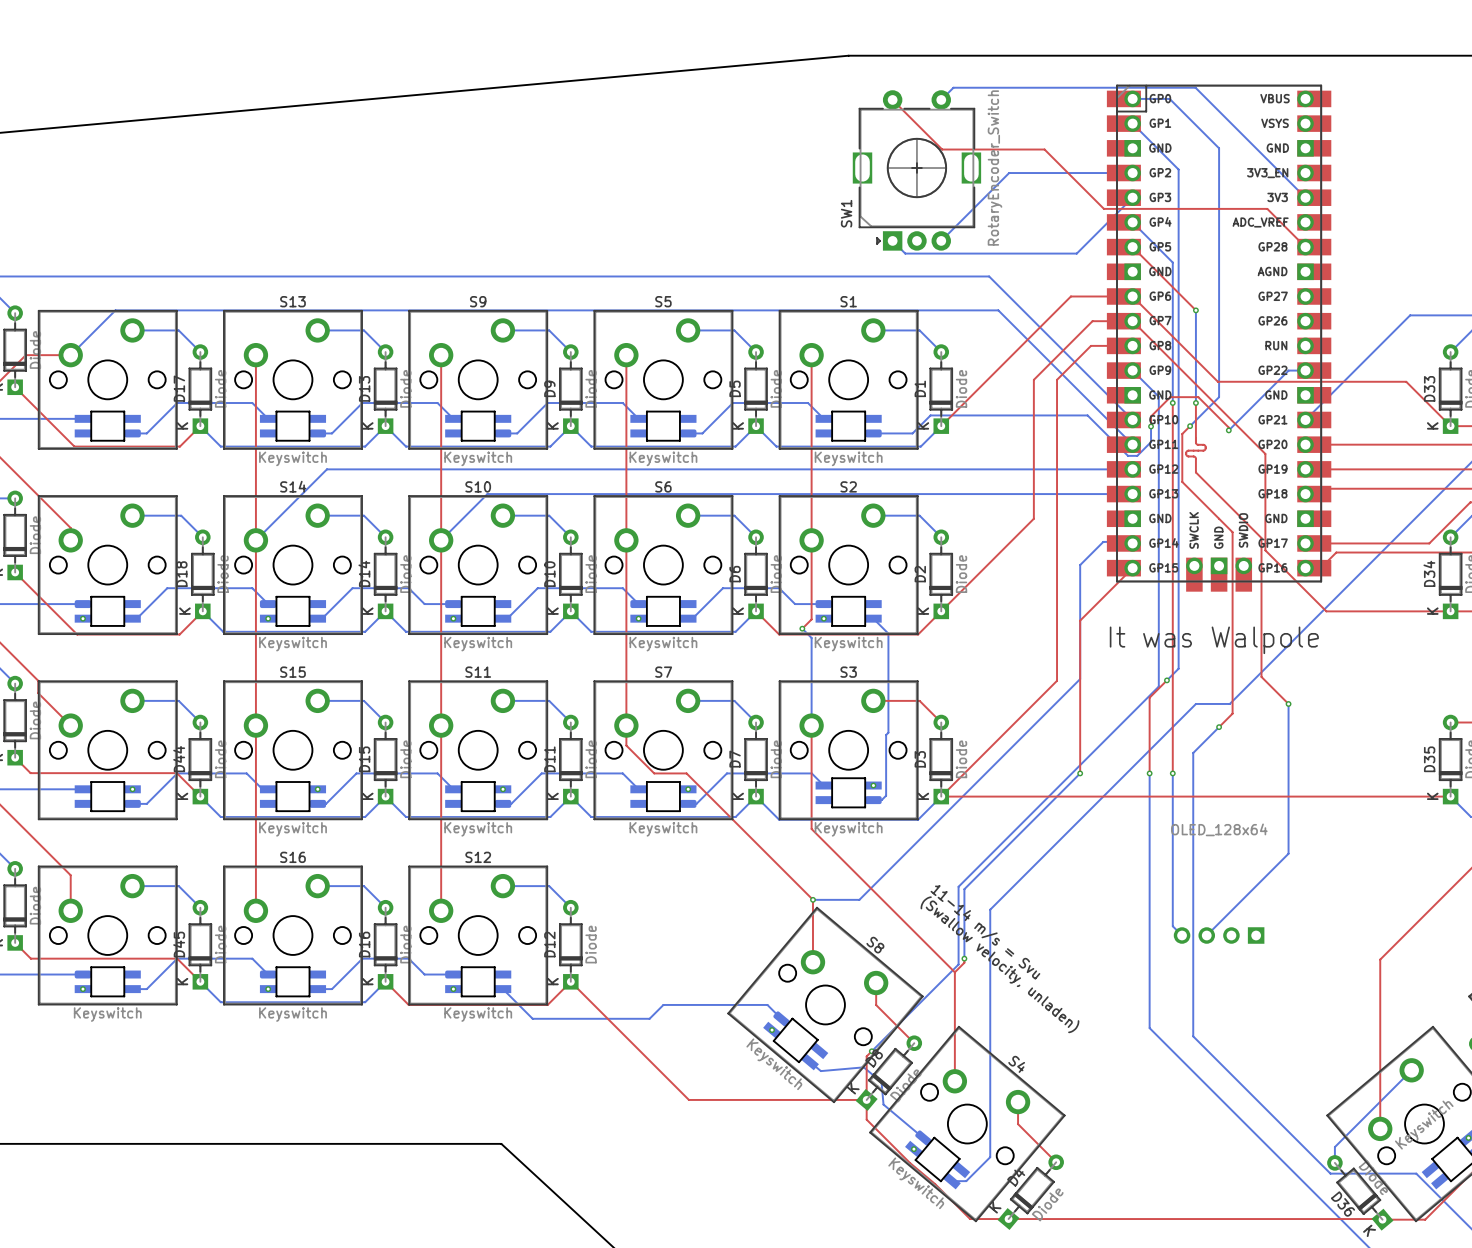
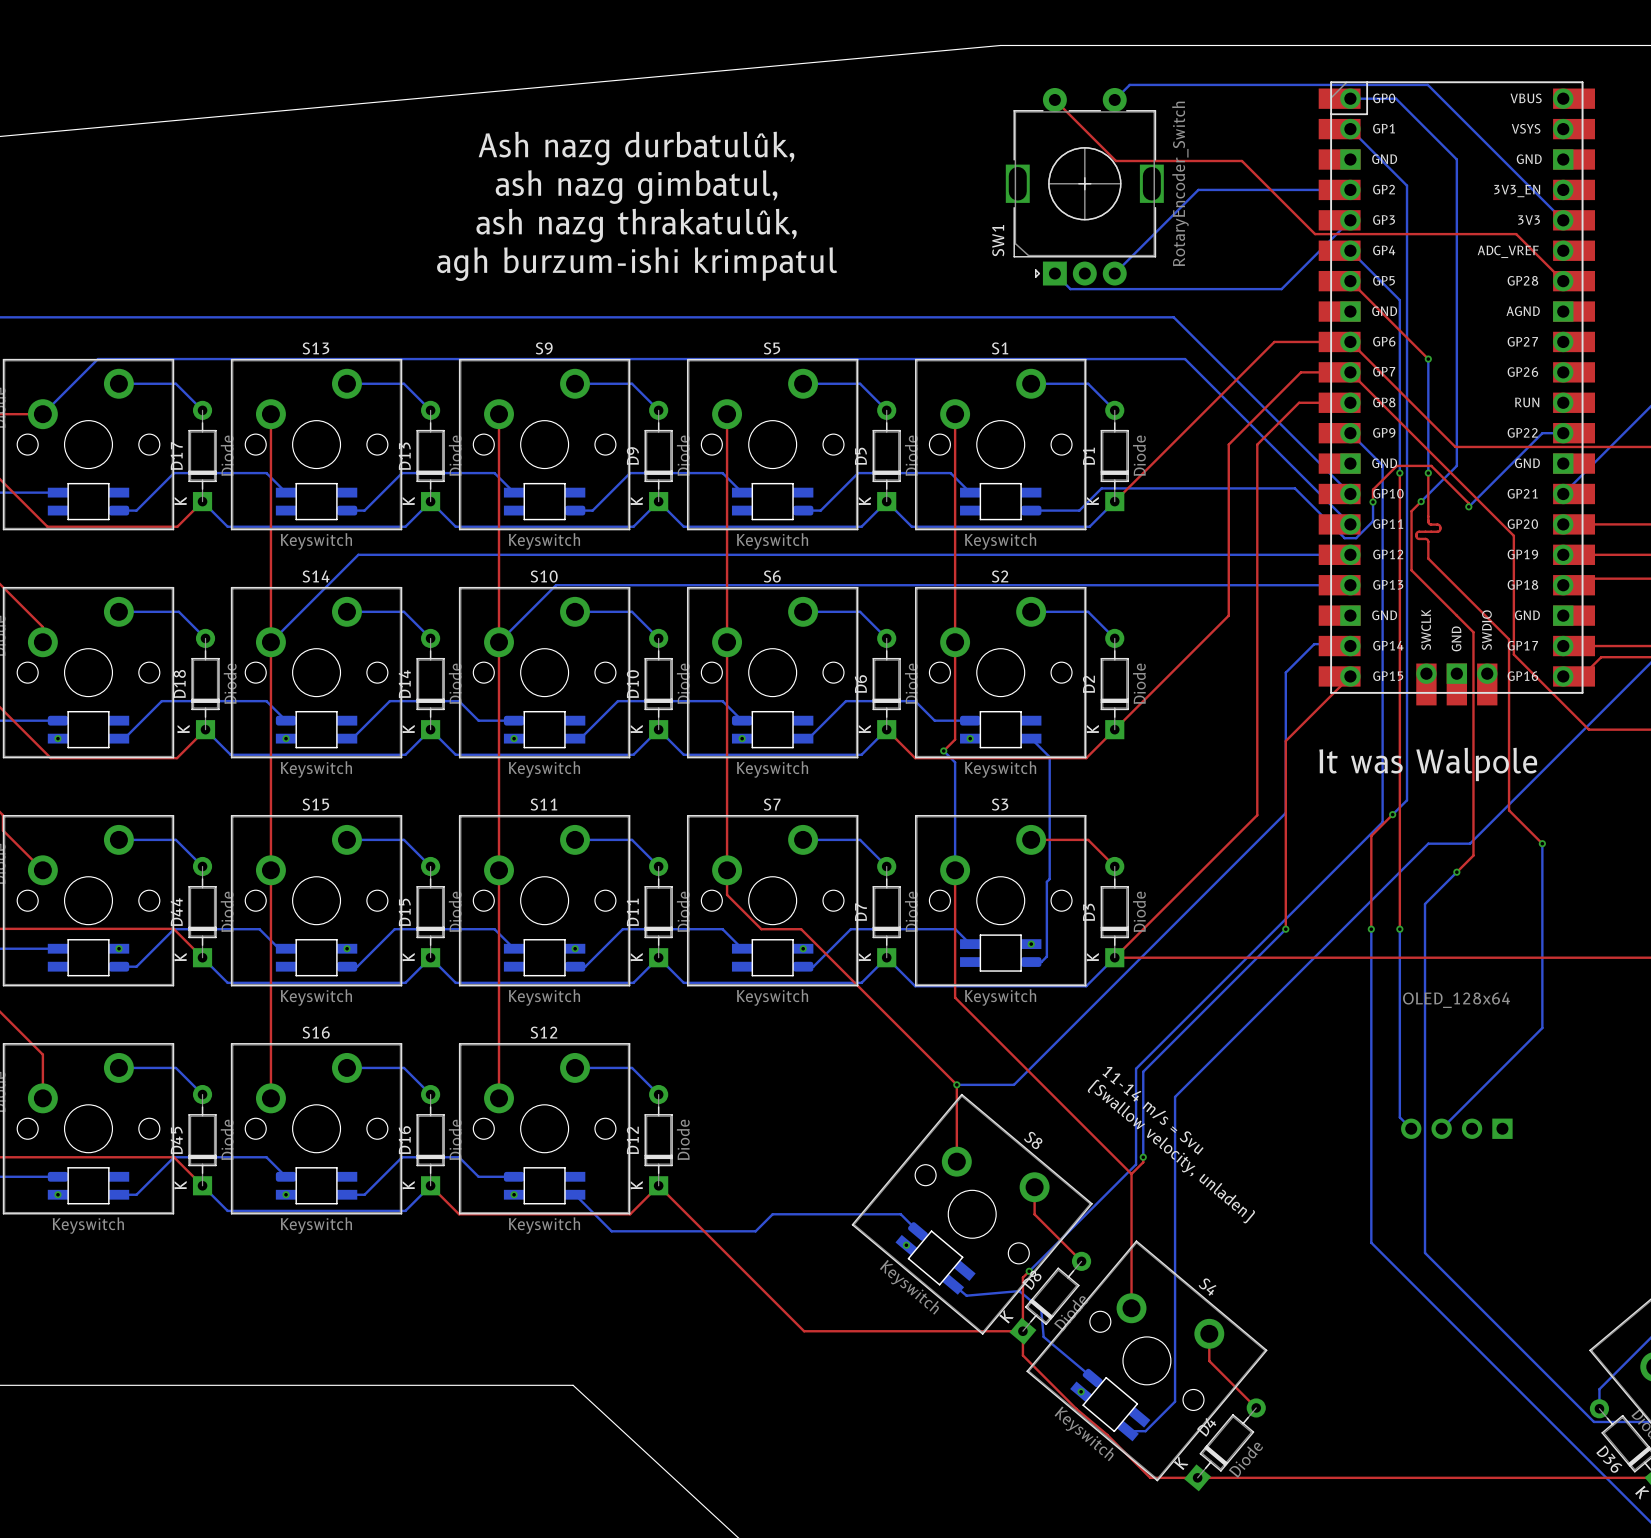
text: none -> Ash nazg durbatulûk, (636, 148)
text: none -> ash nazg gimbatul, (636, 187)
text: none -> ash nazg thrakatulûk, (636, 225)
text: none -> agh burzum-ishi krimpatul (637, 264)

